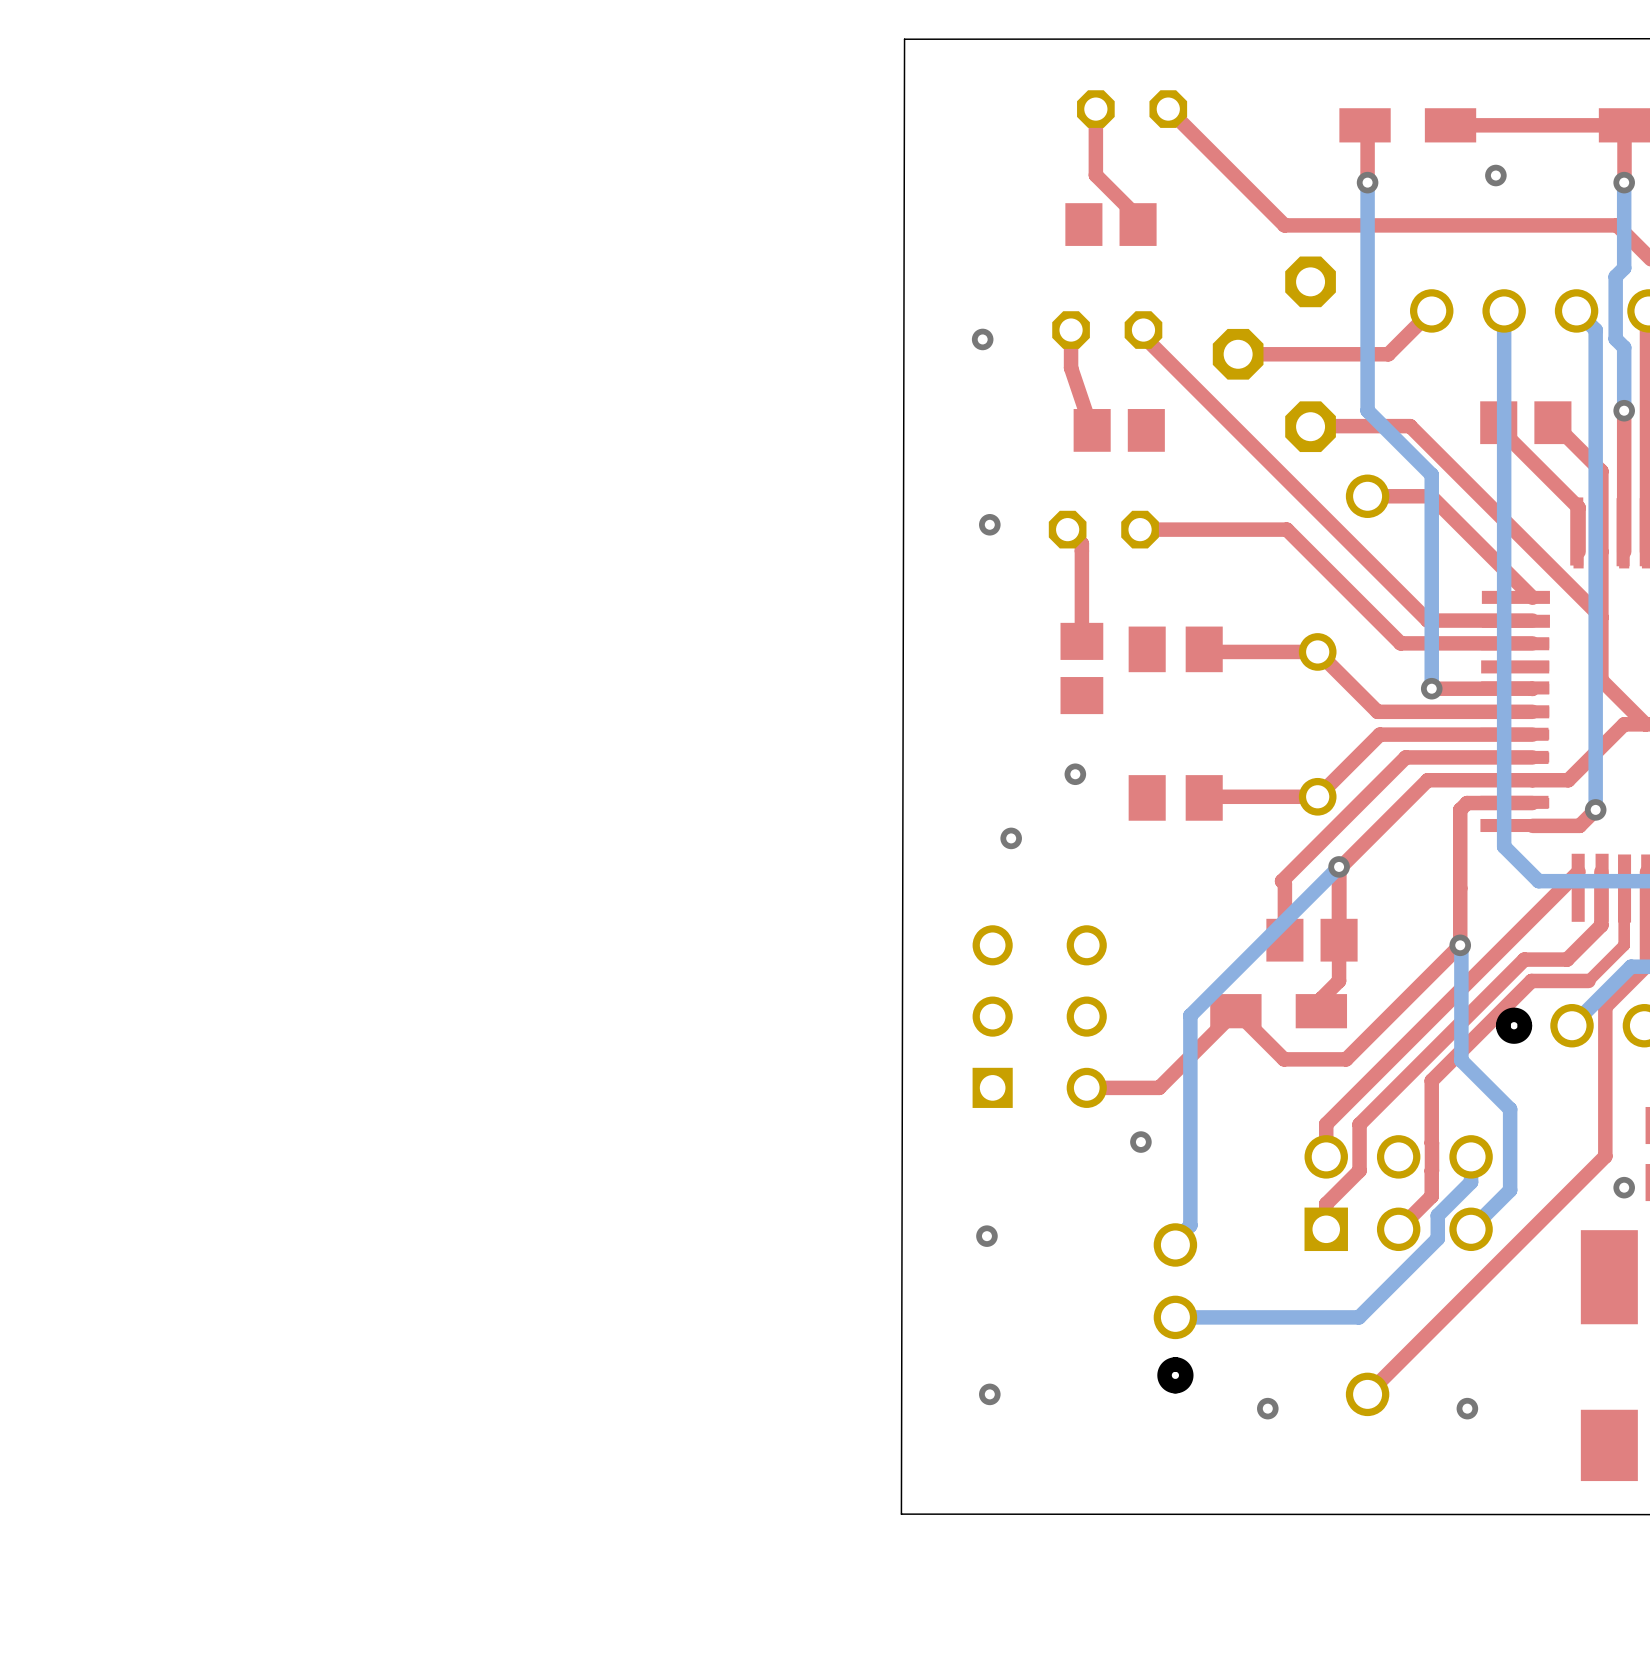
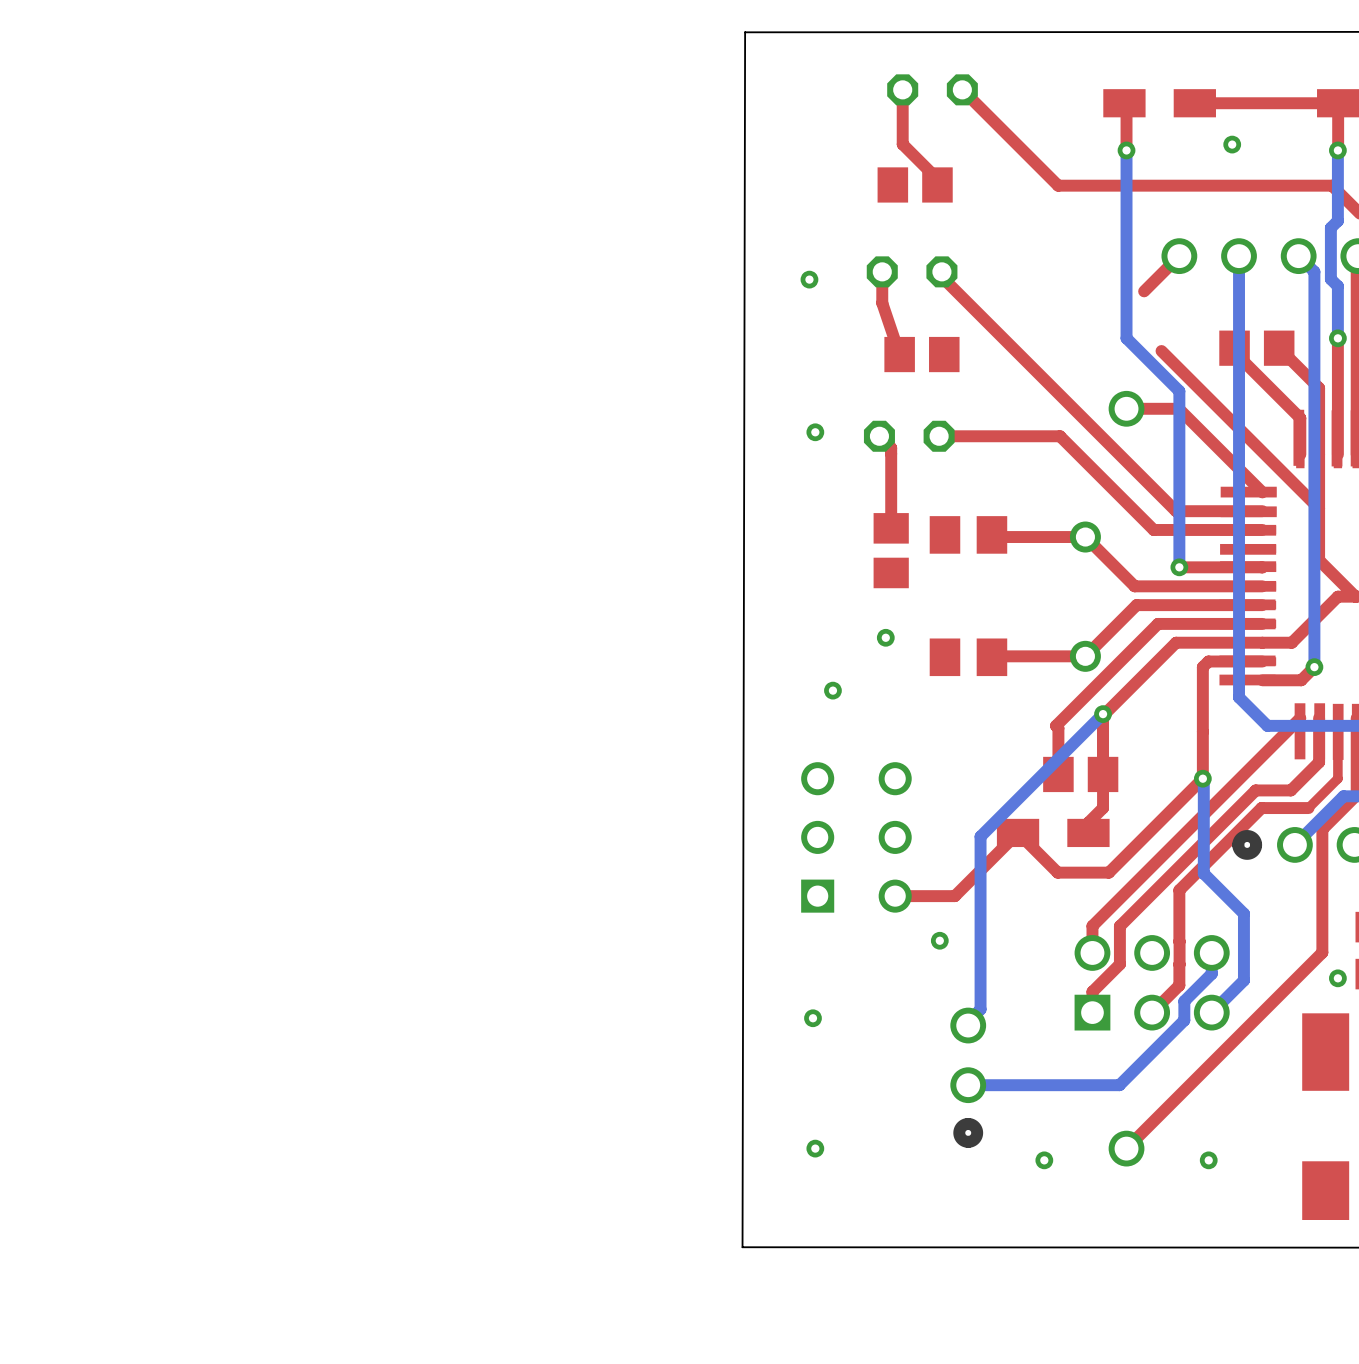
top track: (1388, 353) (1238, 354) -> none
part: (1274, 354) -> none
top track: (1410, 426) (1310, 426) -> none

